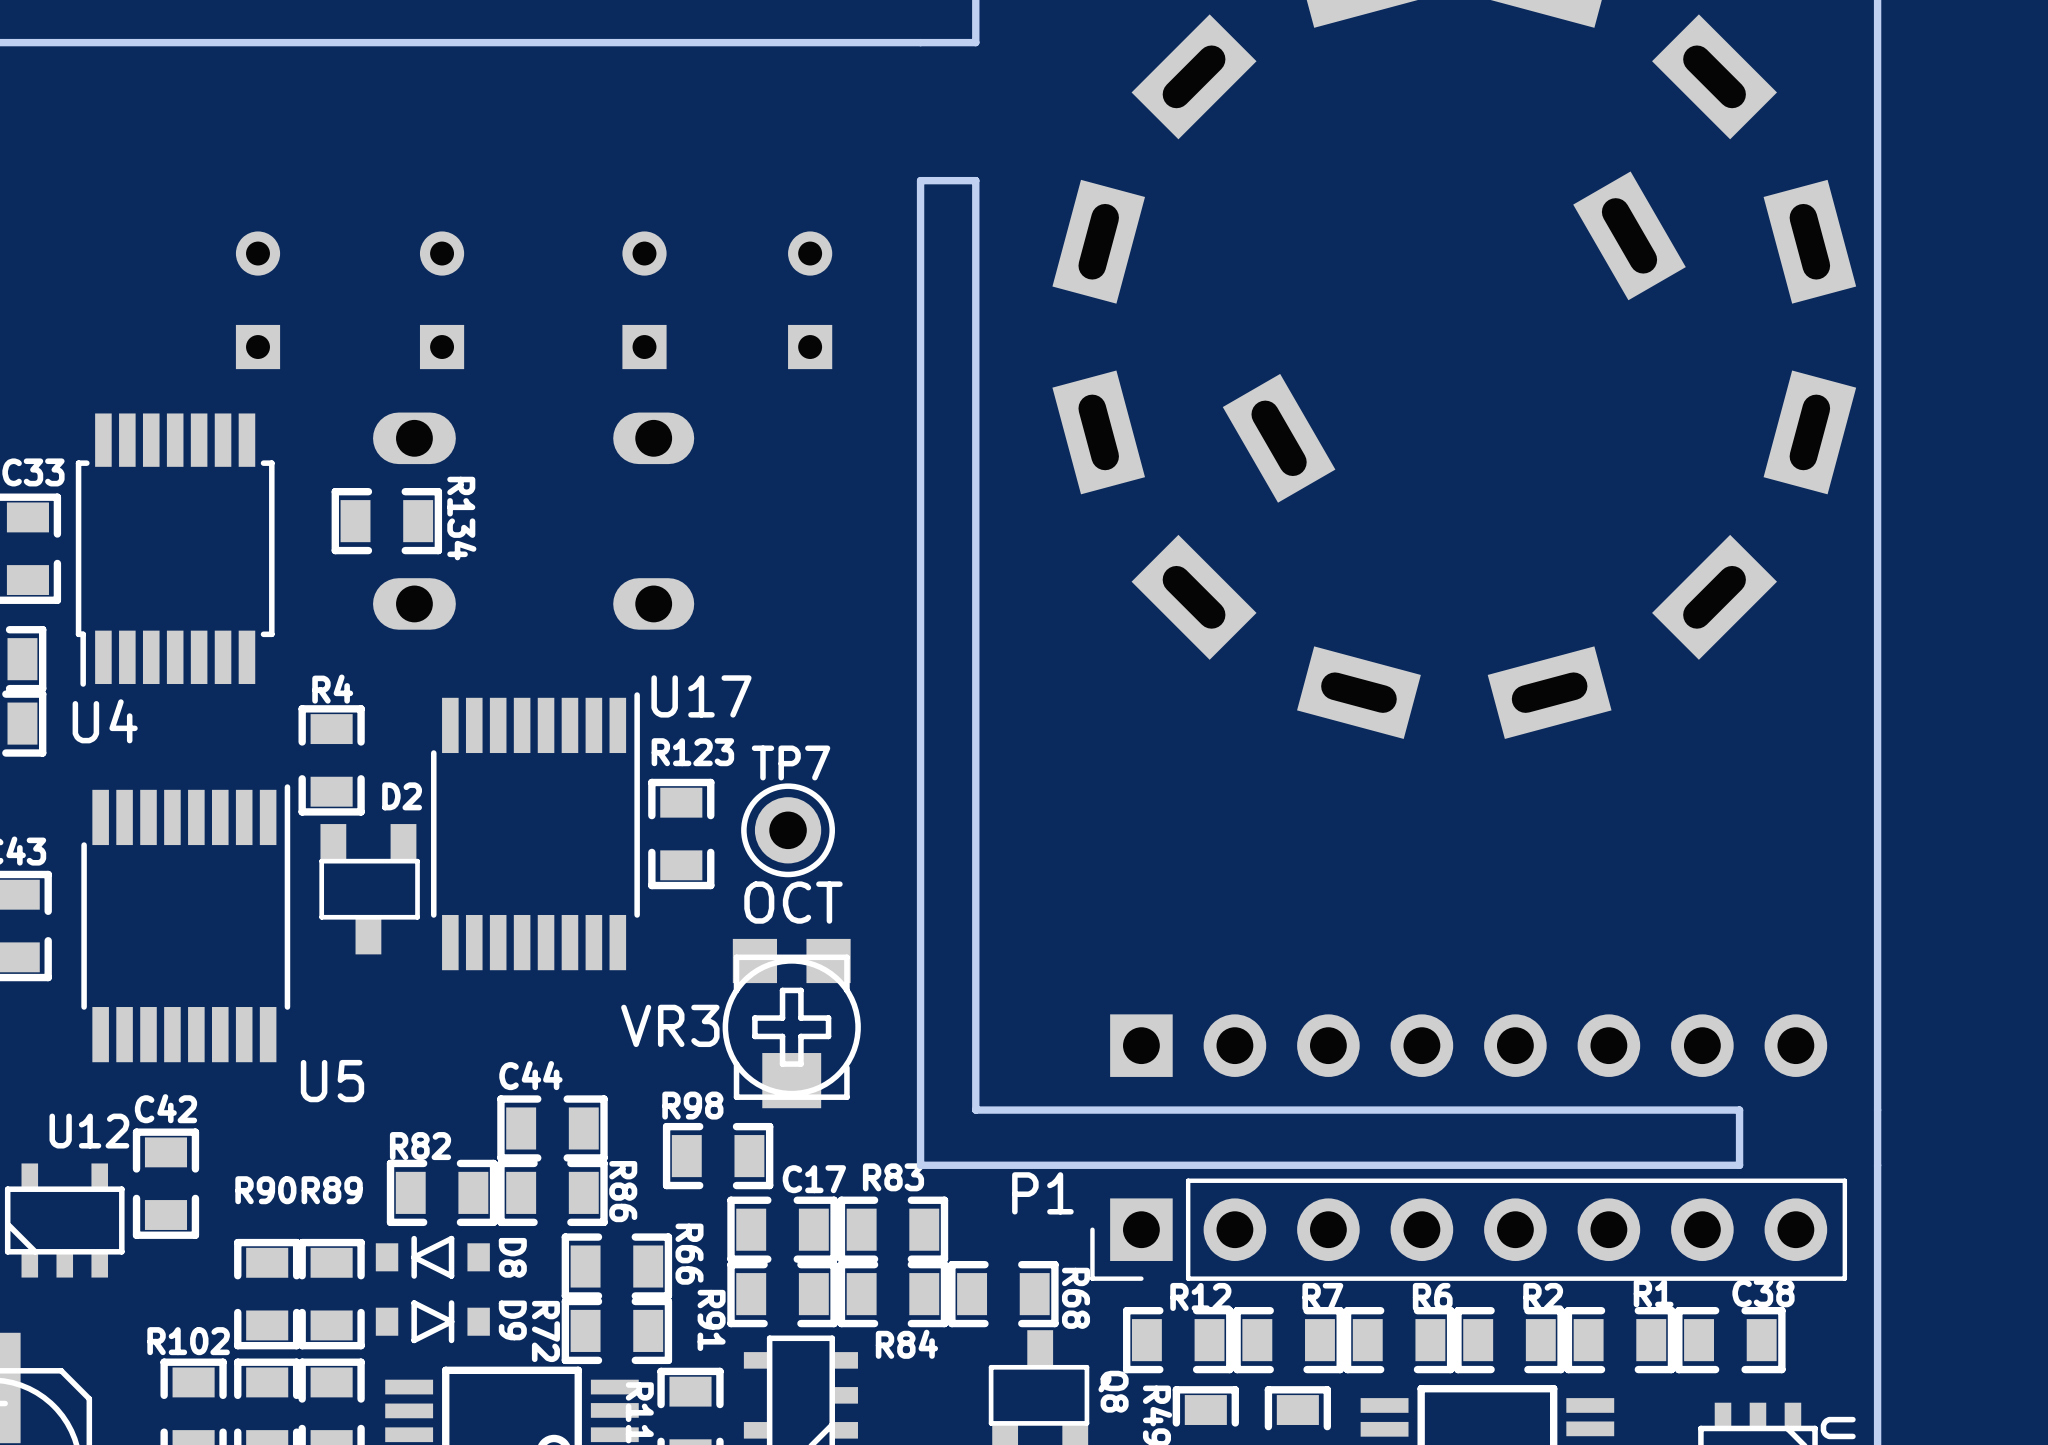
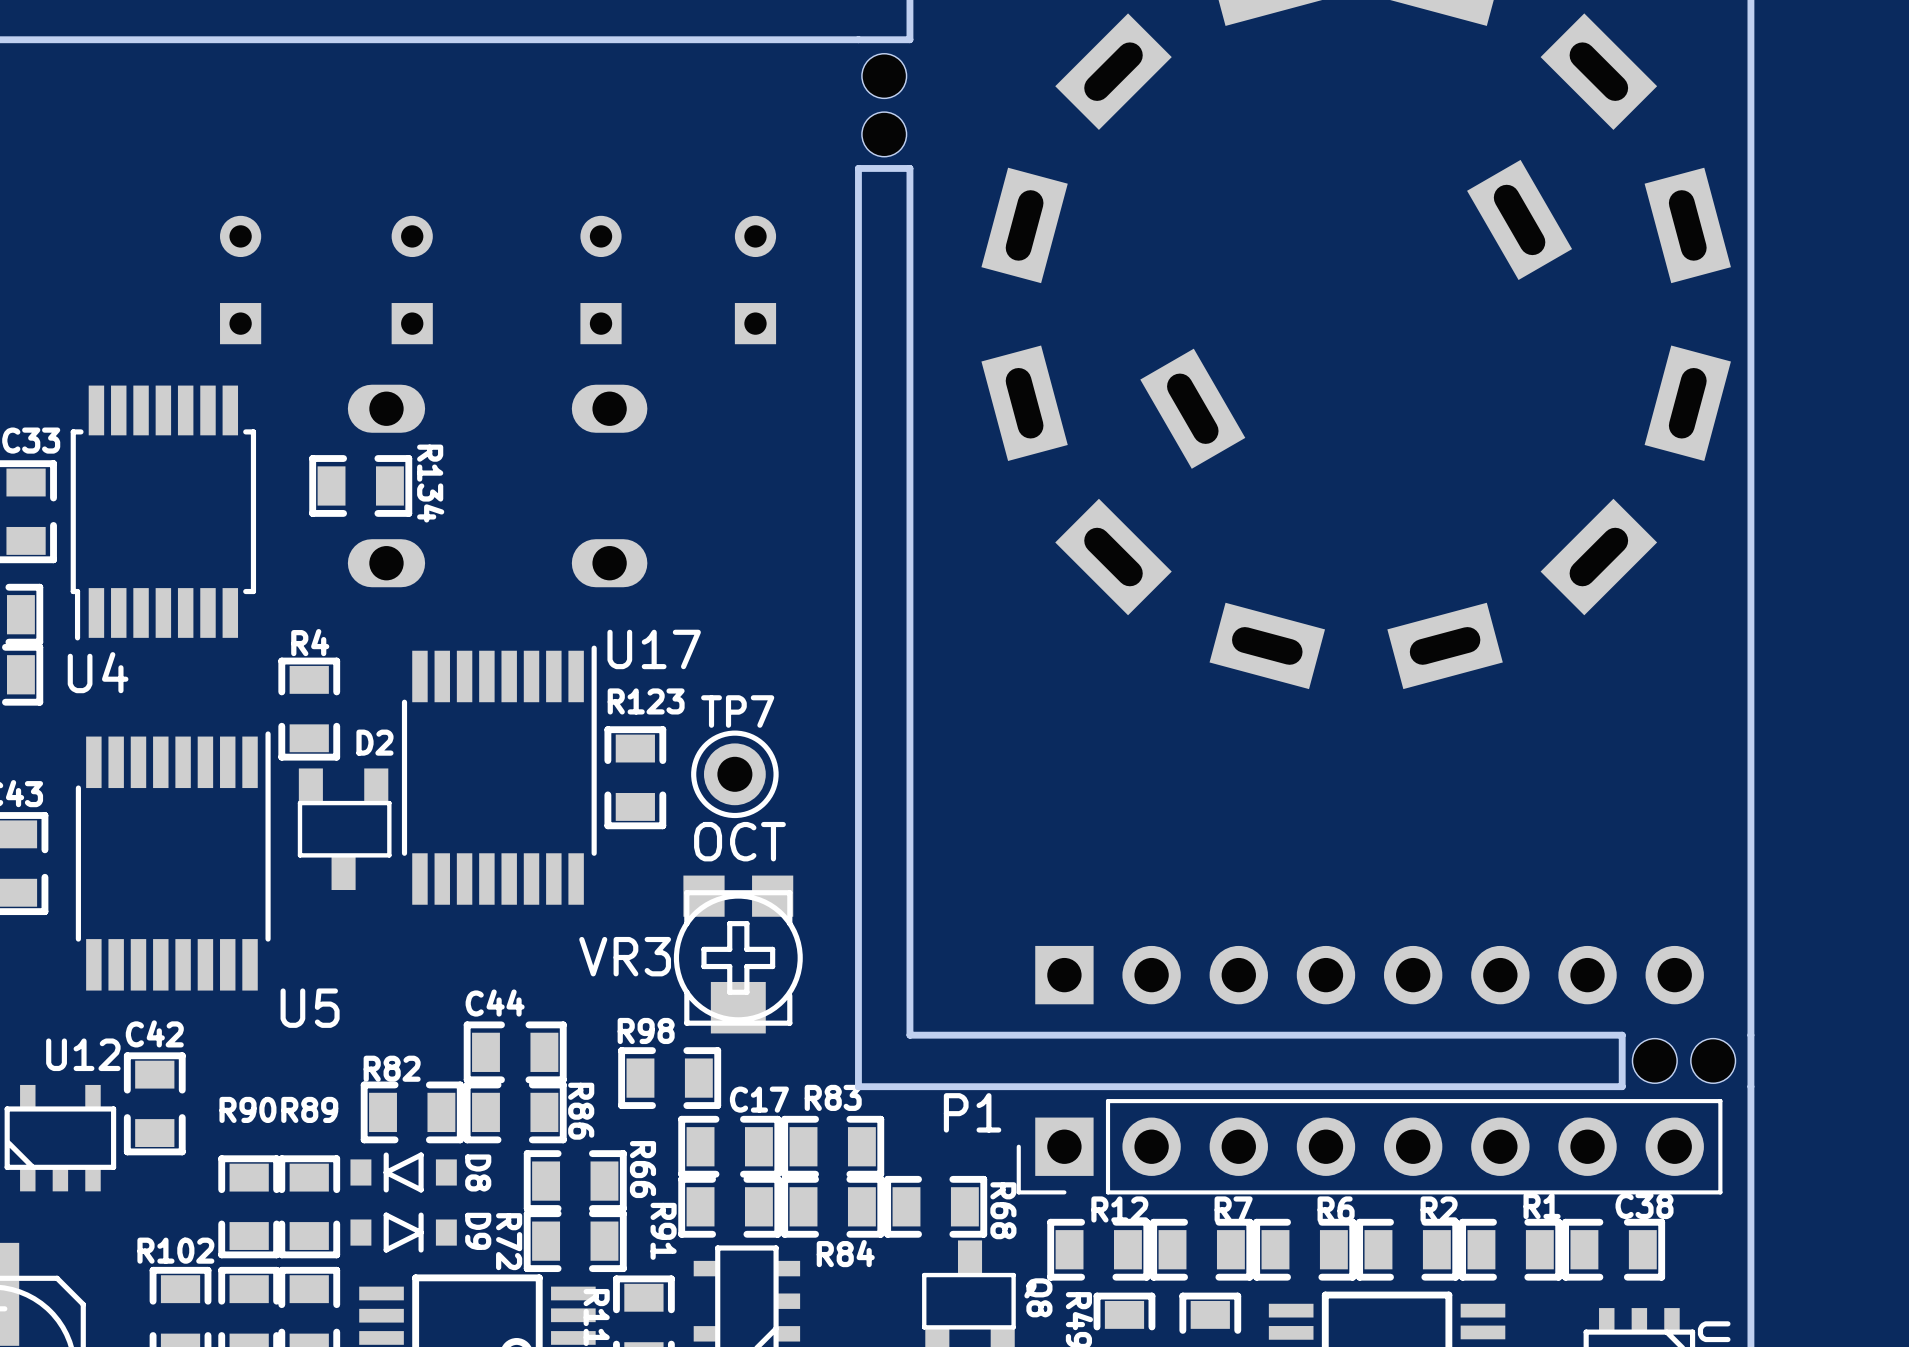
part: none -> (884, 76)
part: none -> (884, 134)
part: none -> (1654, 1060)
part: none -> (1713, 1060)

